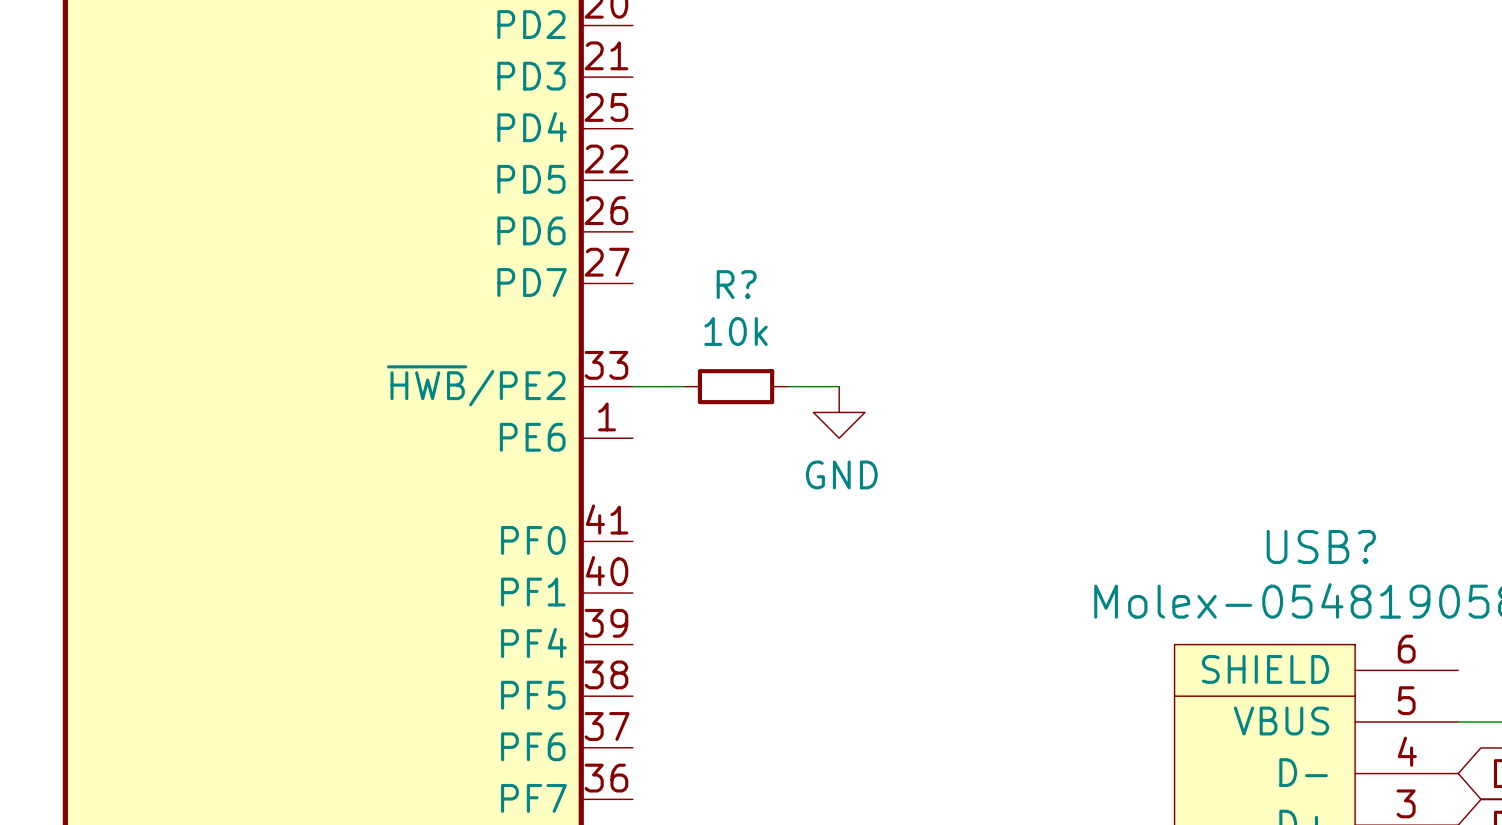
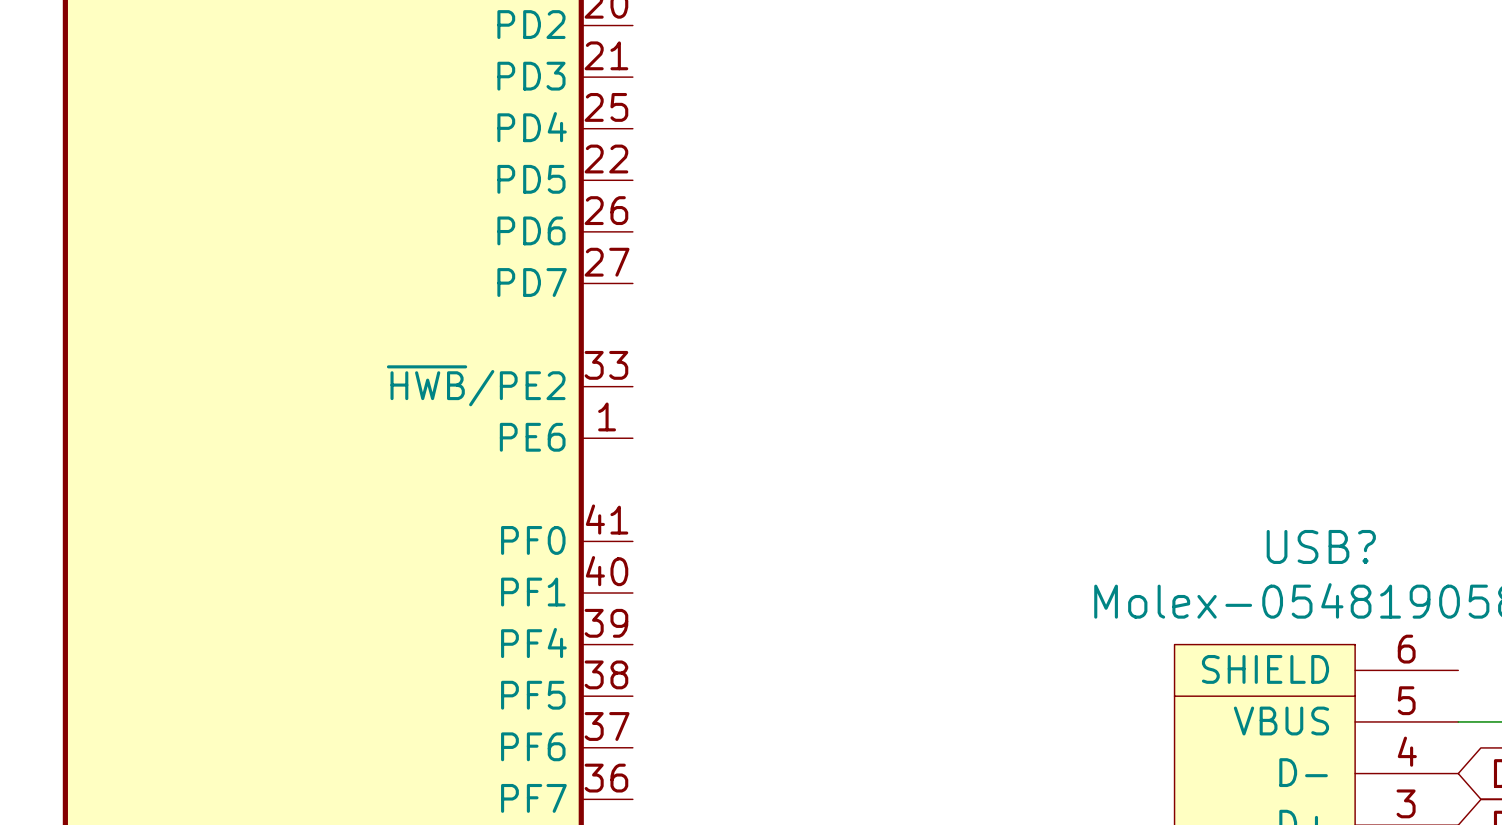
wire: (632, 386) (684, 386) -> none
R?: 10k (736, 386) -> none
wire: (787, 386) (839, 386) -> none
power symbol: GND (839, 412) -> none

